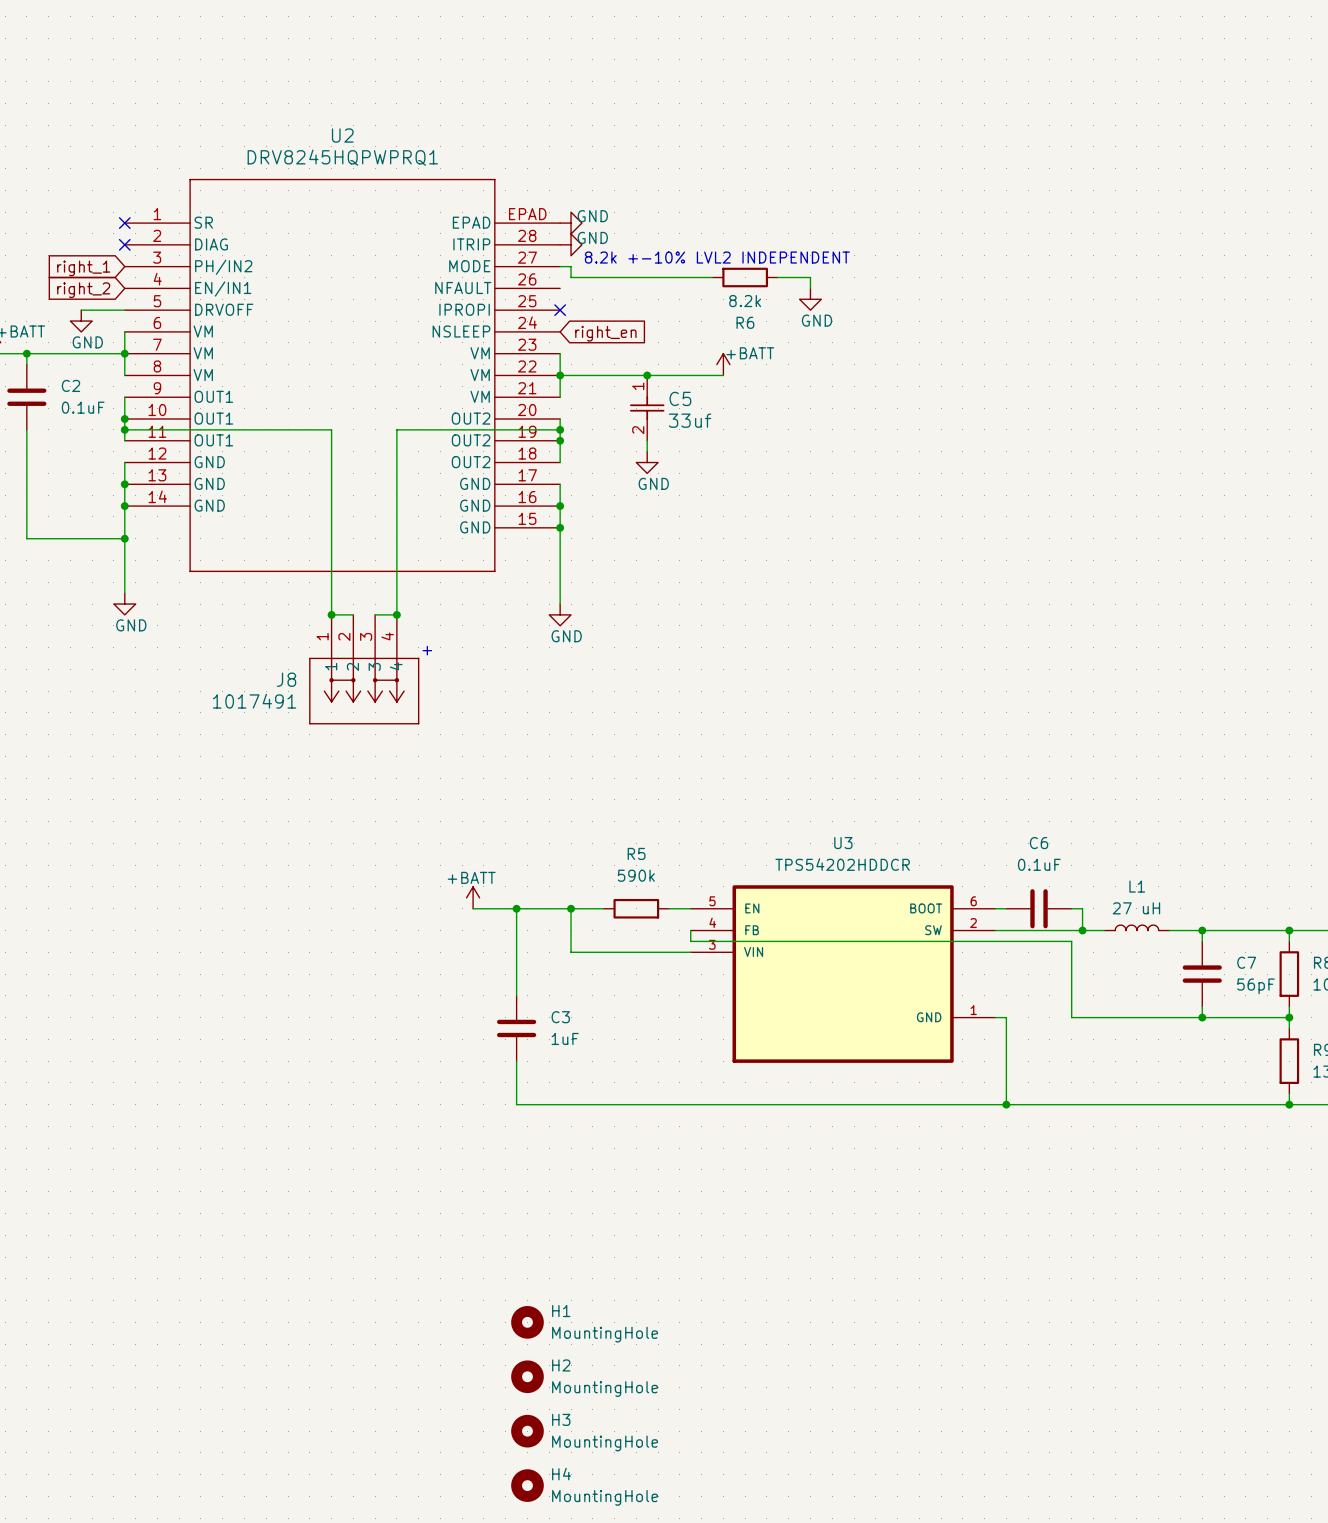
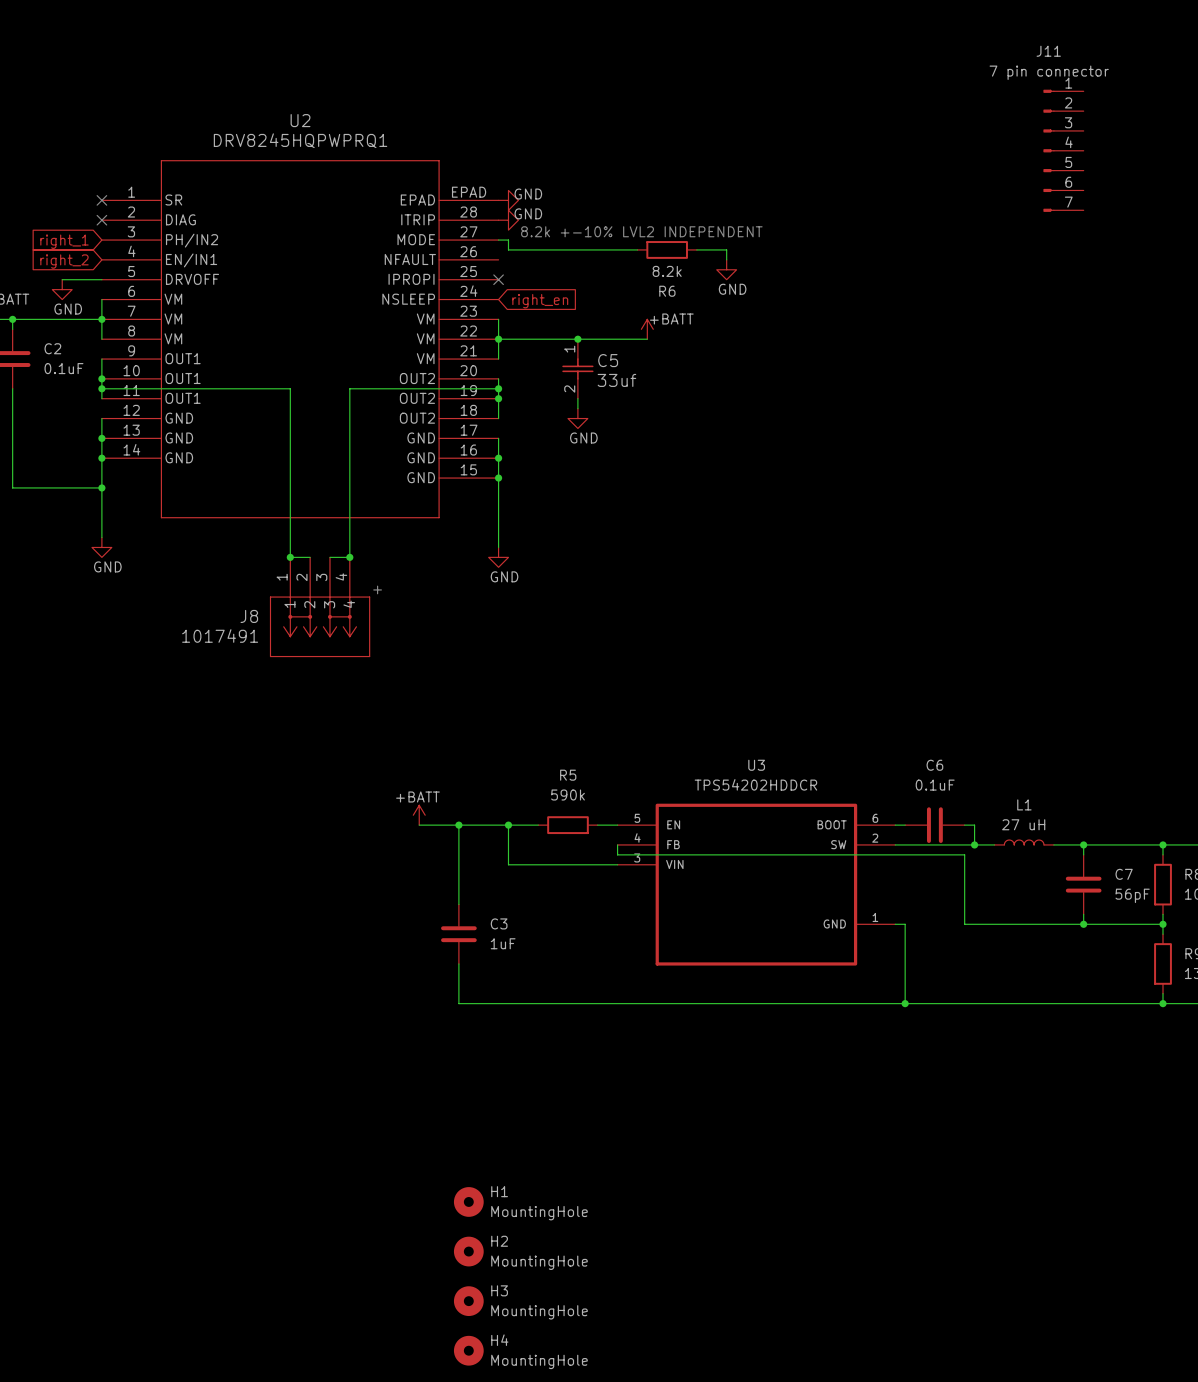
J11: none -> 7 pin connector (1063, 150)

